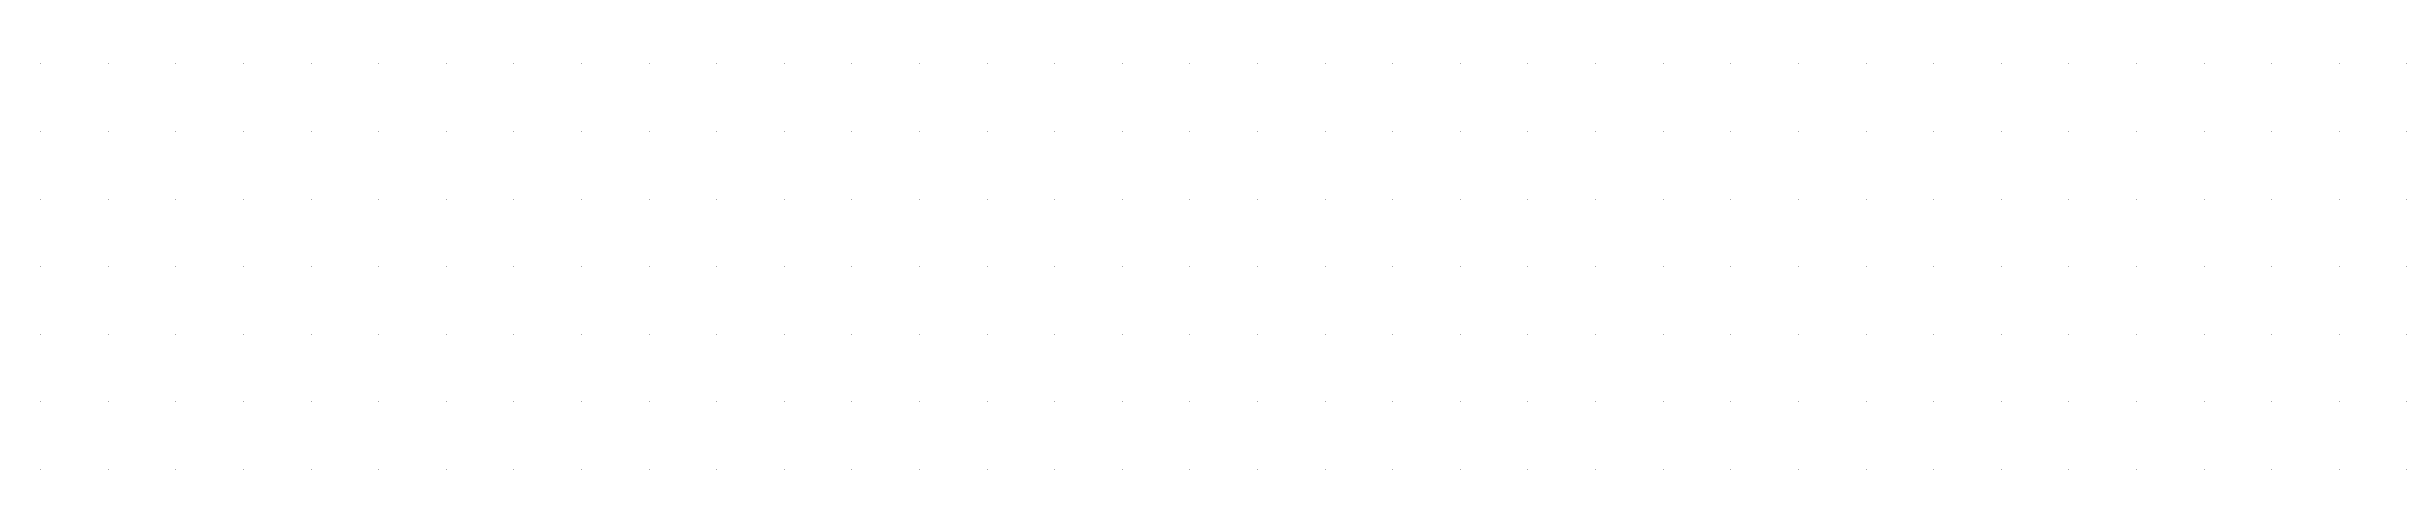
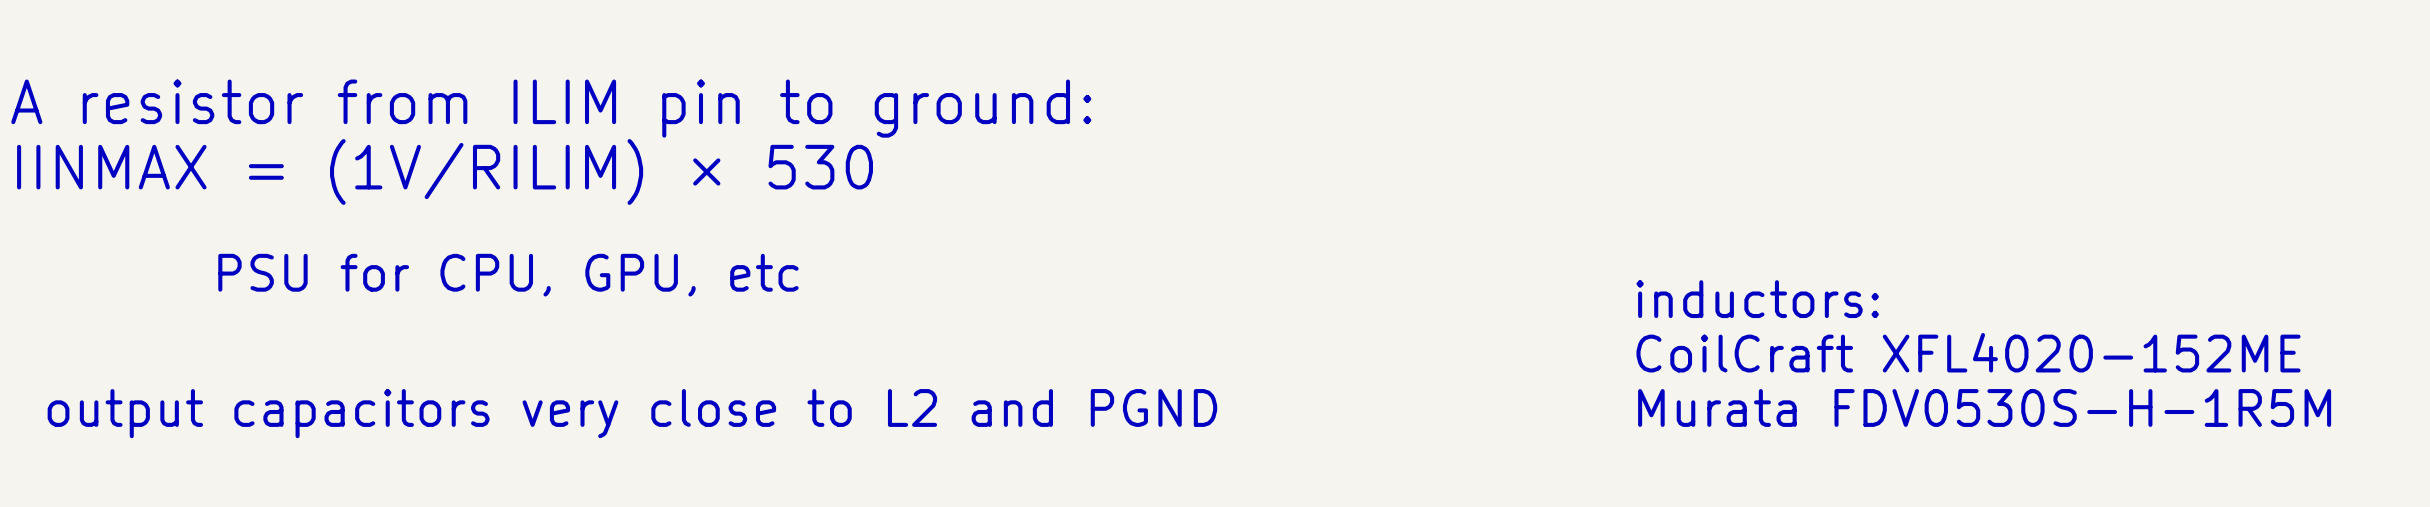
text: none -> A resistor from ILIM pin to ground: (551, 108)
text: none -> IINMAX = (1V/RILIM) × 530 (445, 171)
text: none -> PSU for CPU, GPU, etc (508, 275)
text: none -> inductors: (1757, 299)
text: none -> CoilCraft XFL4020-152ME (1968, 352)
text: none -> Murata FDV0530S-H-1R5M (1984, 407)
text: none -> output capacitors very close to L2 and PGND (632, 413)

